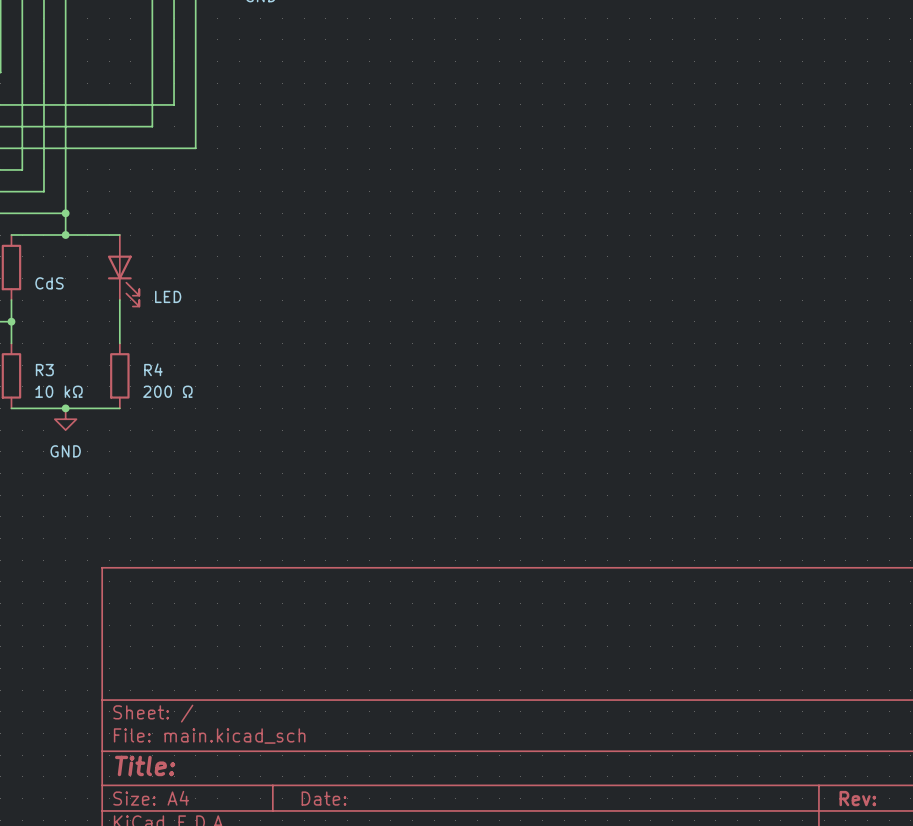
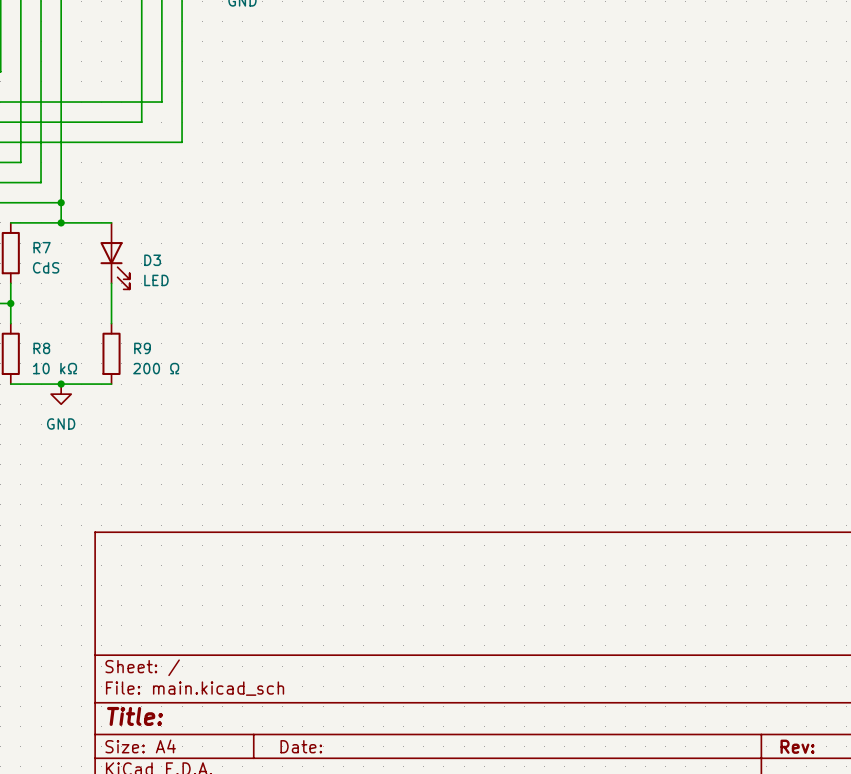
R7 name: none -> R7 (42, 247)
D3 name: none -> D3 (152, 260)
R4 name: R4 (153, 369) -> R9 (142, 348)
R3 name: R3 (44, 370) -> R8 (41, 348)

